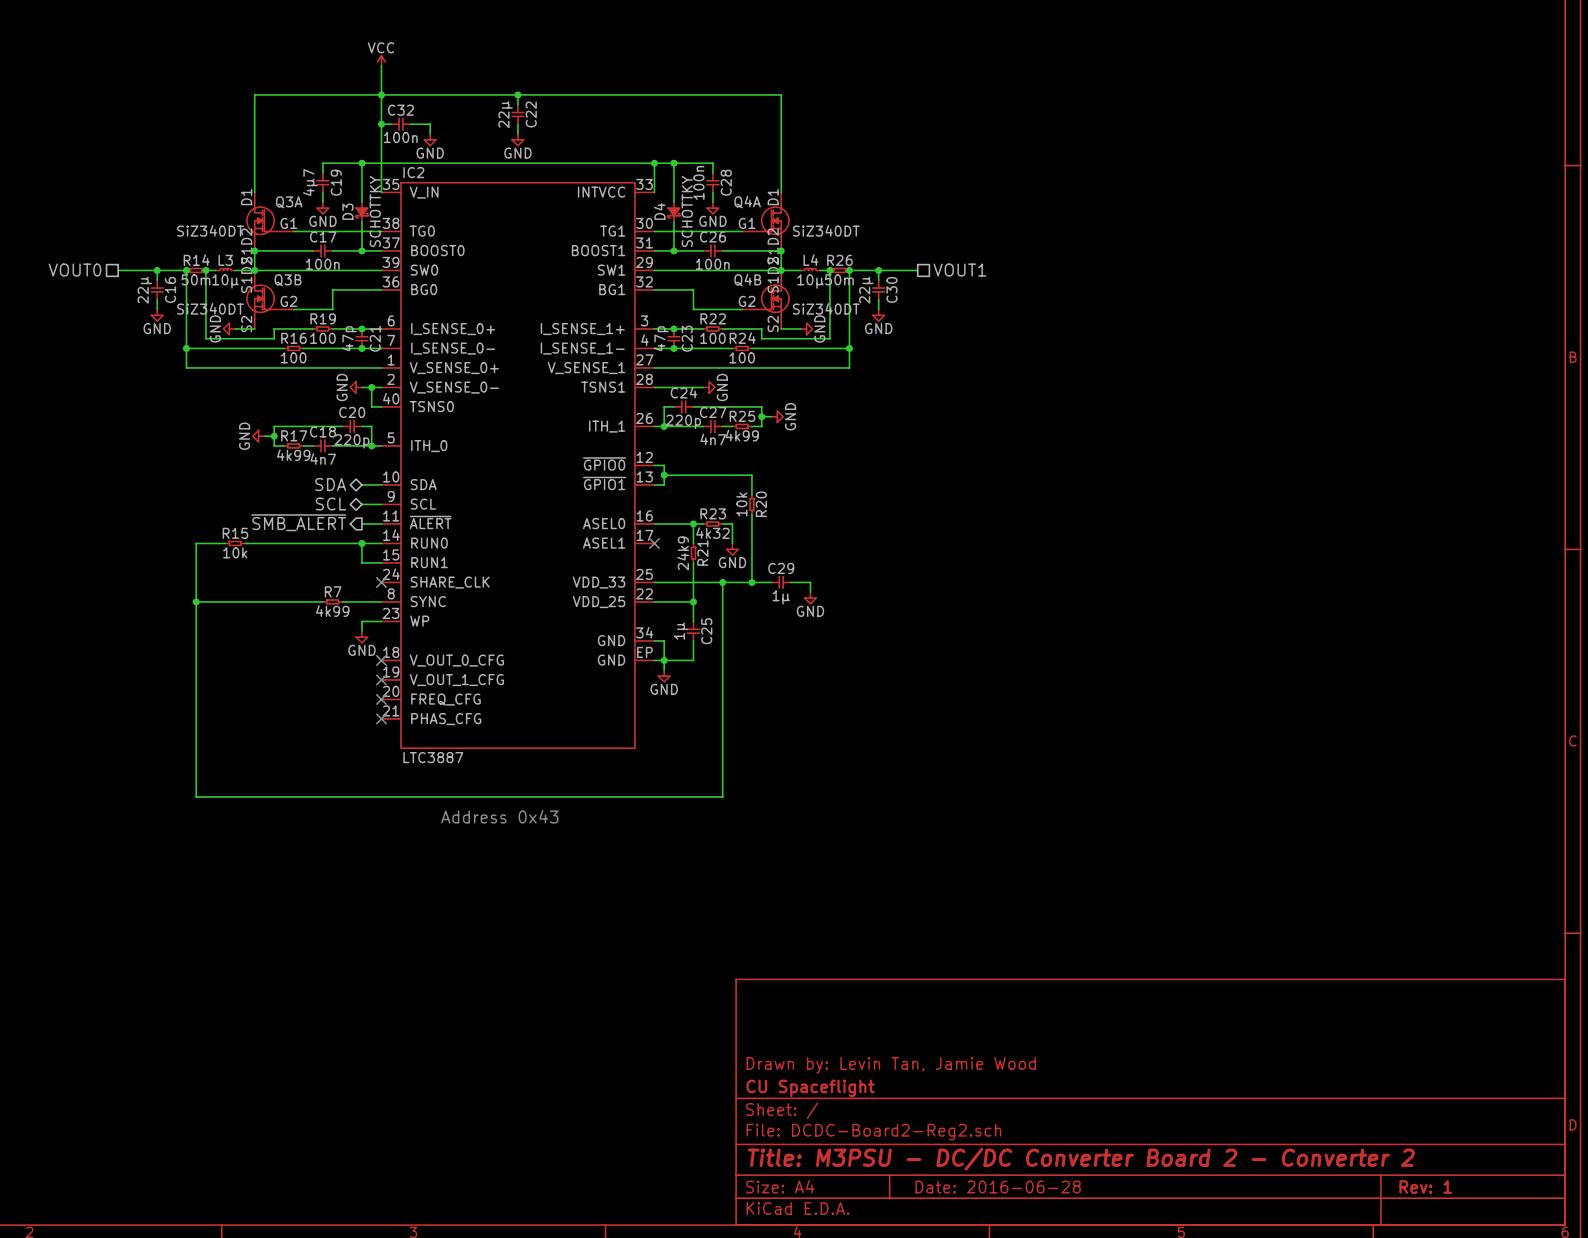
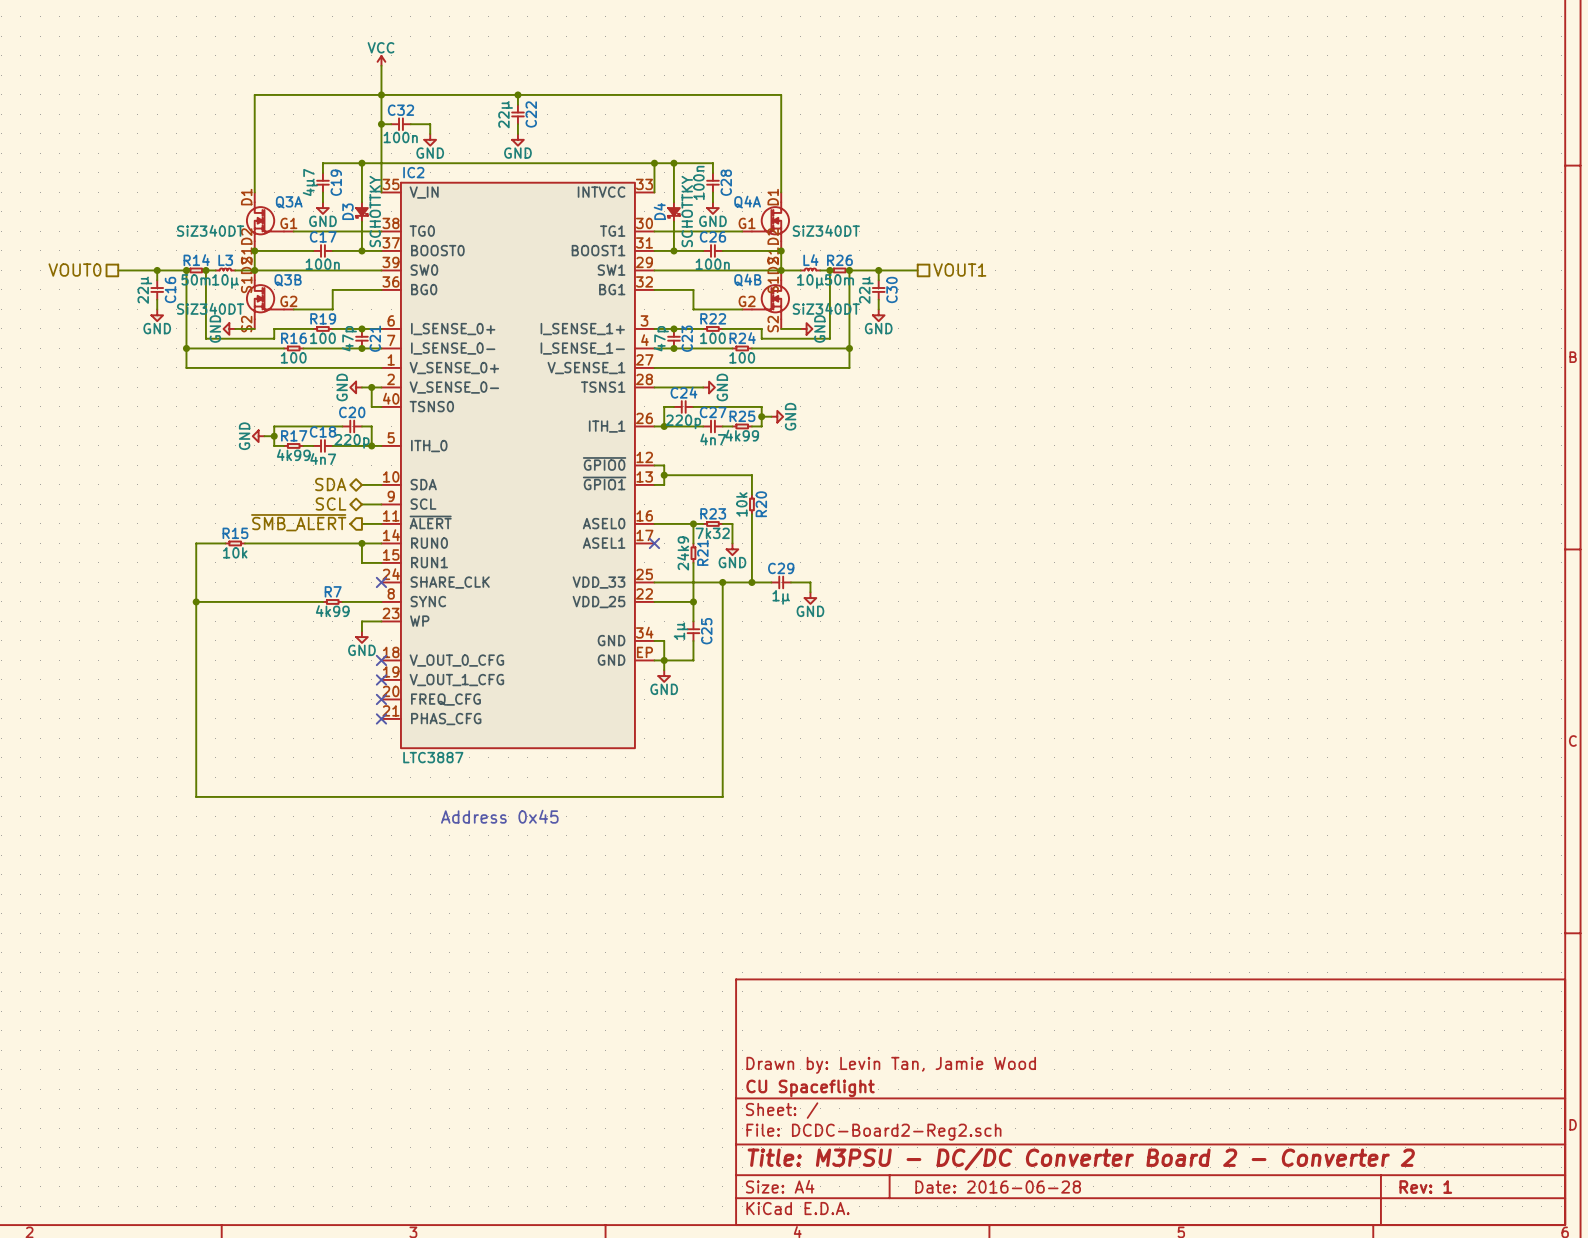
R23 value: 4k32 (712, 533) -> 7k32 (712, 533)
text: Address 0x43 (499, 816) -> Address 0x45 (499, 816)

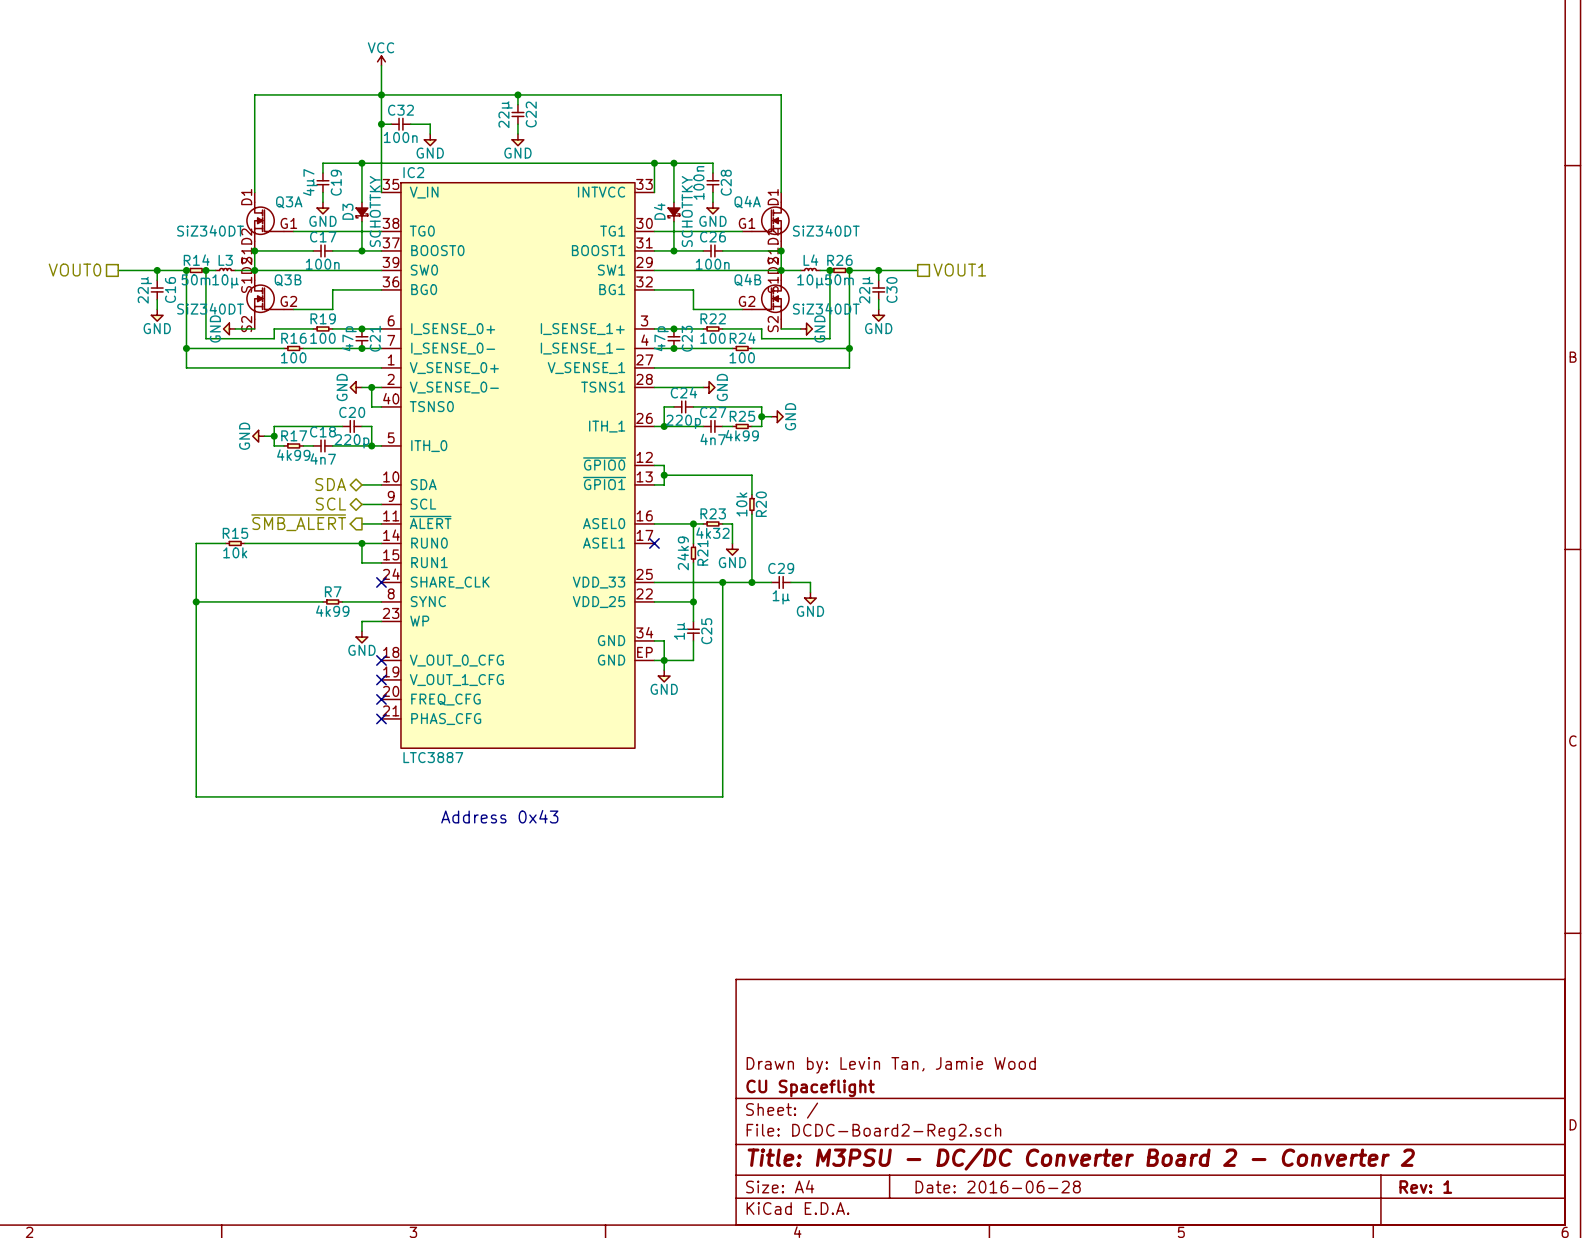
R23 value: 7k32 (712, 533) -> 4k32 (712, 533)
text: Address 0x45 (499, 816) -> Address 0x43 (499, 816)

